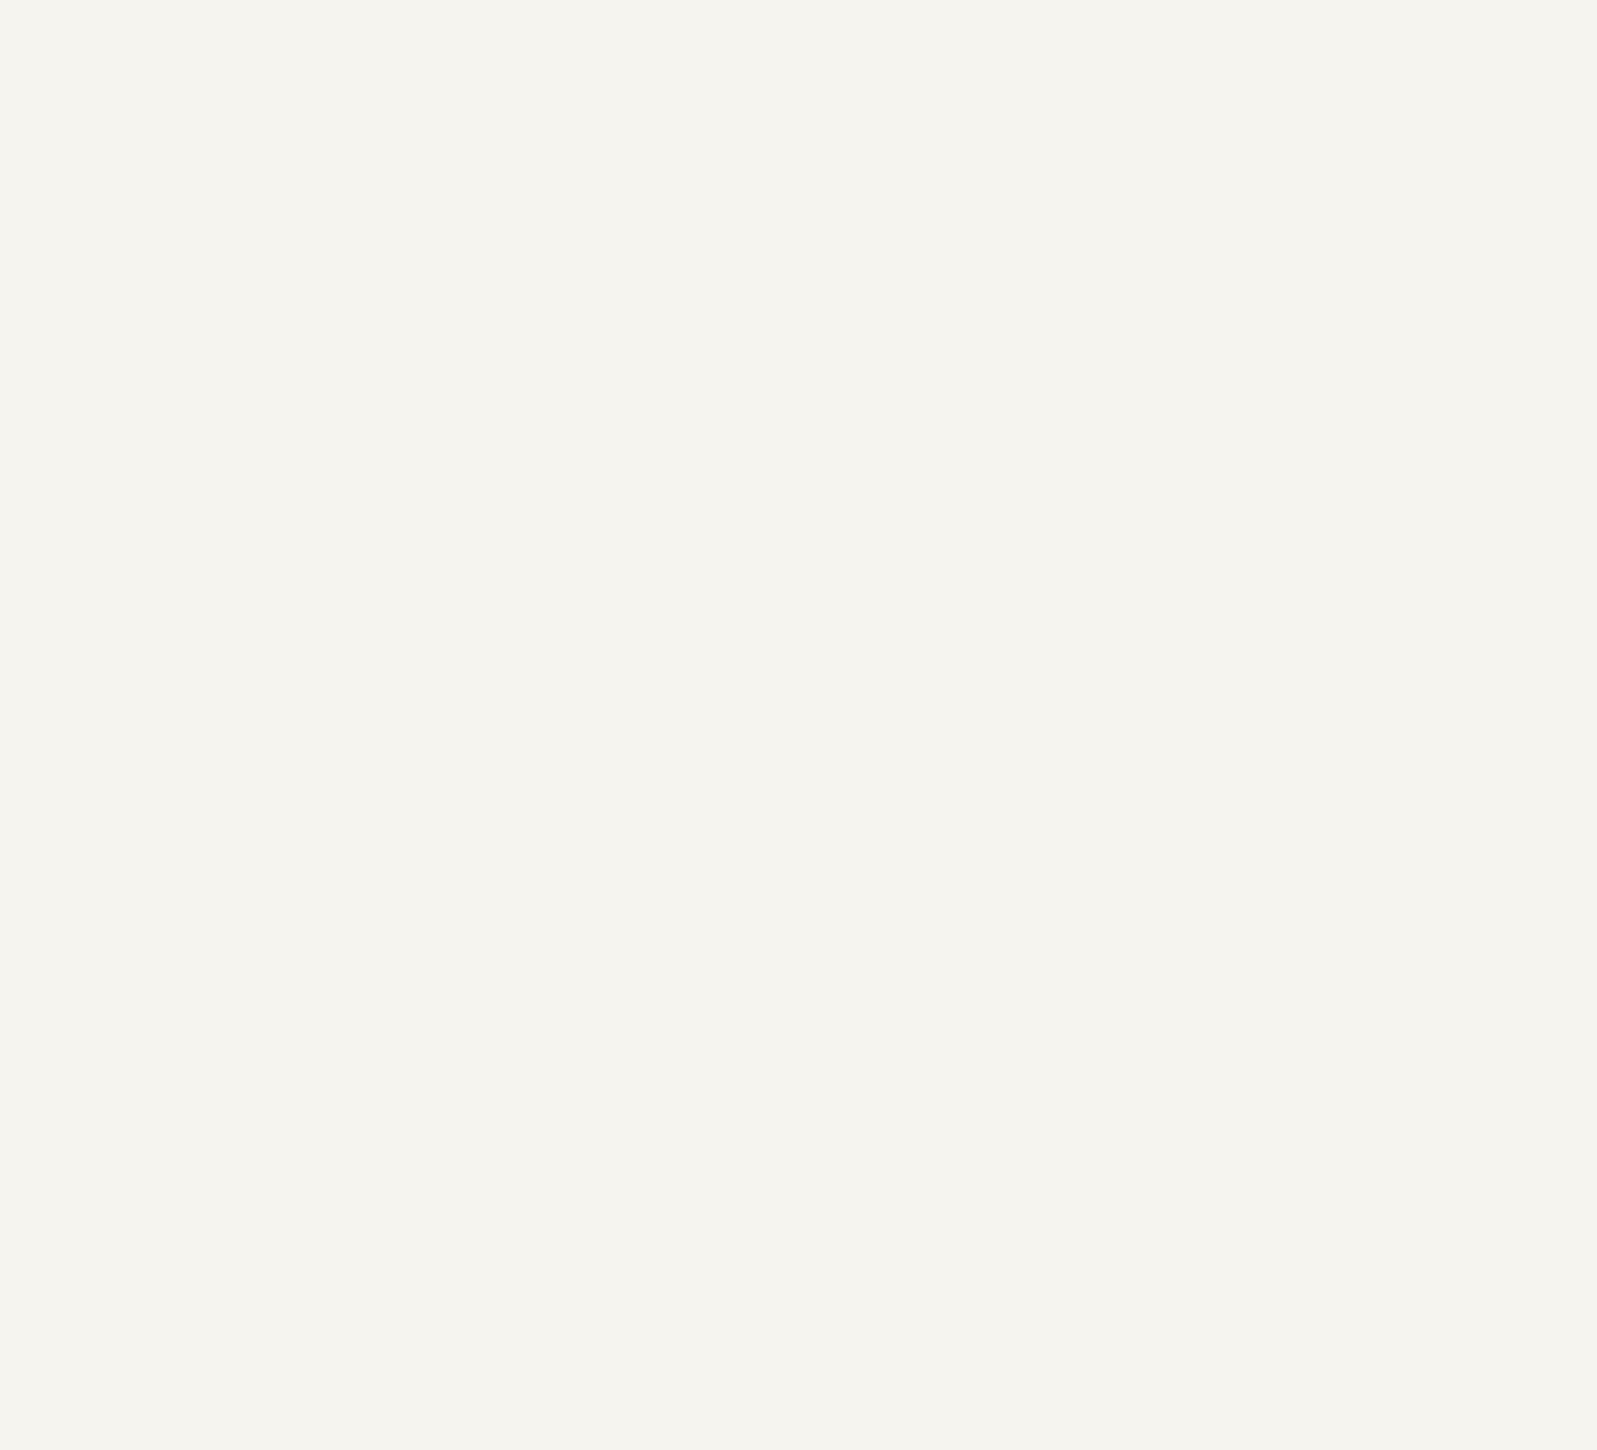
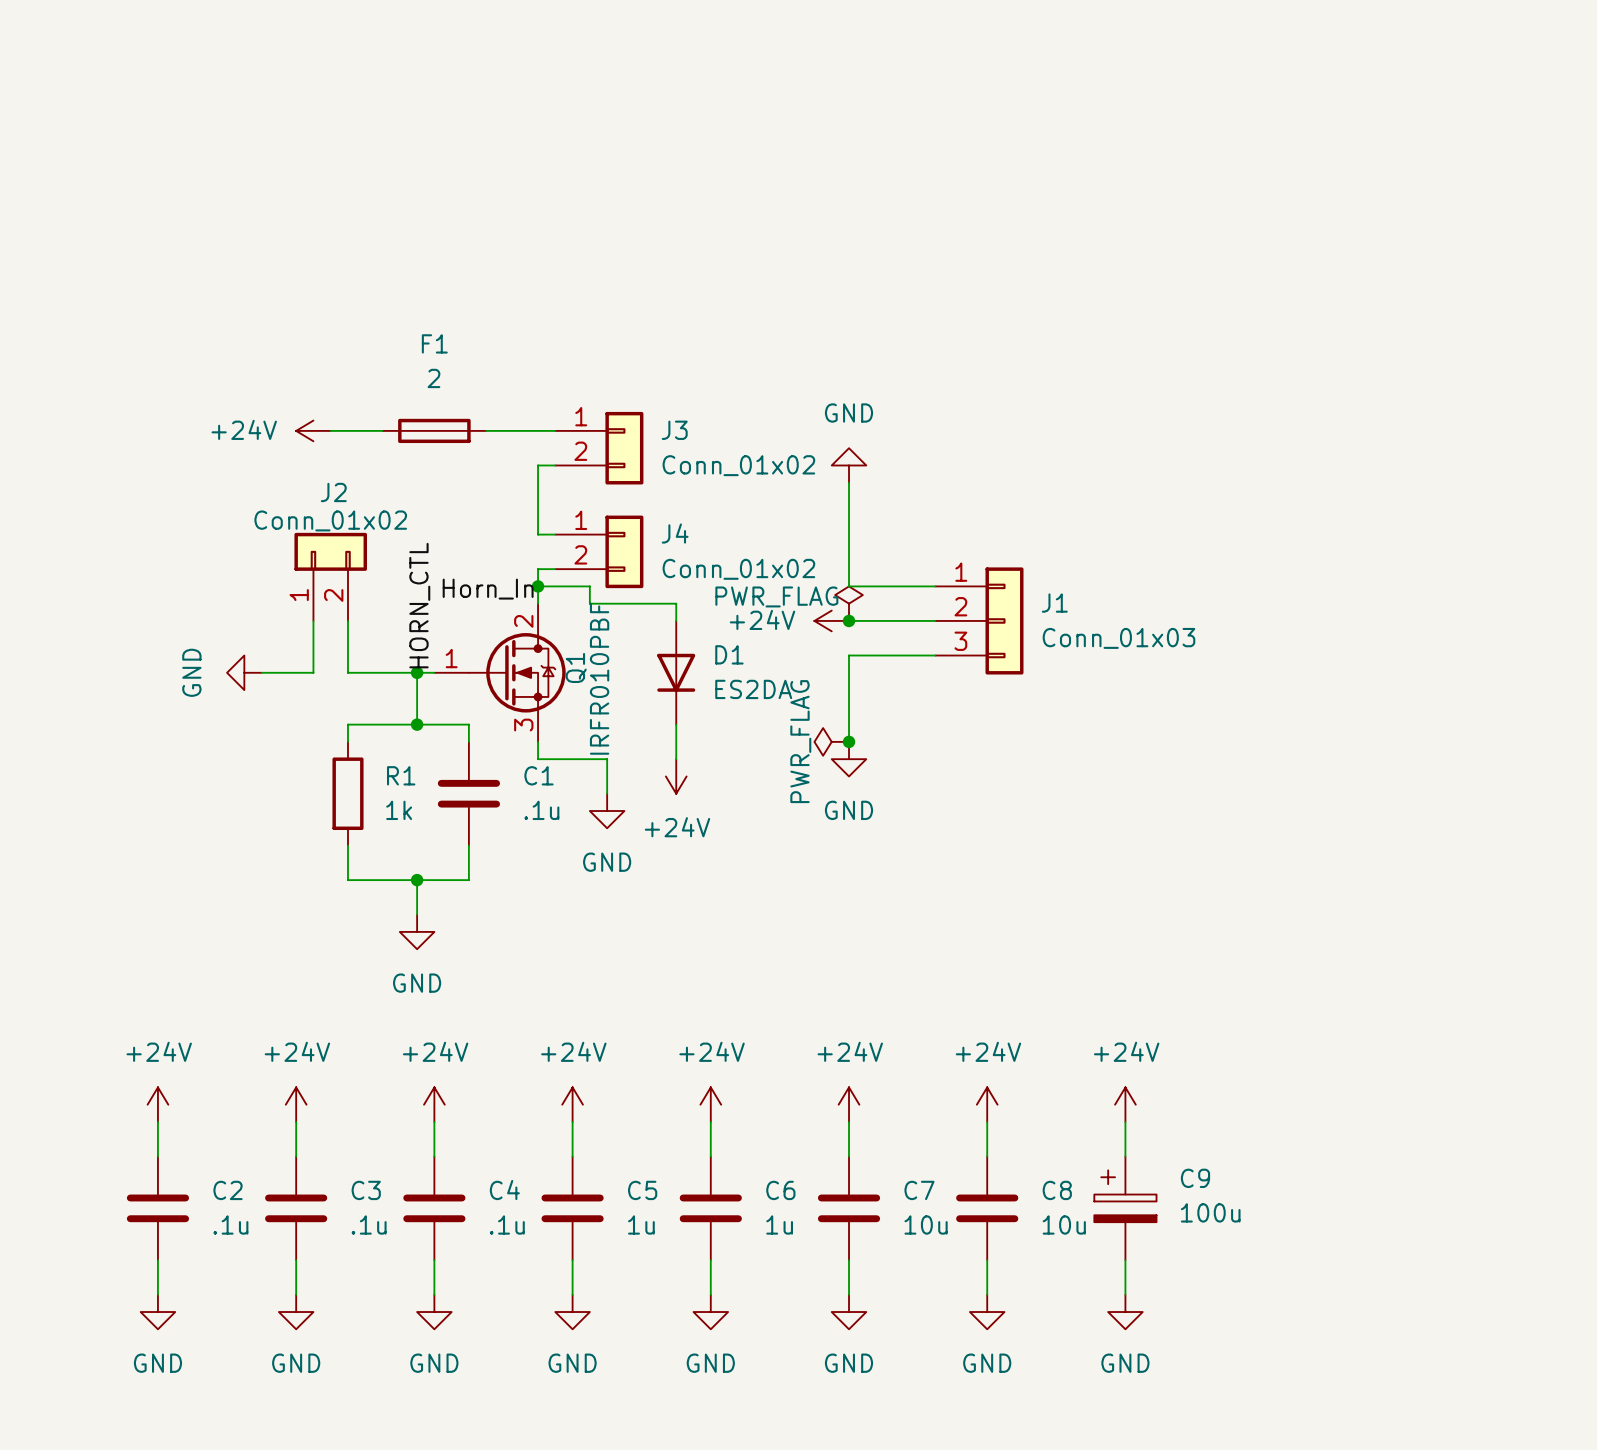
power symbol: none -> +24V (313, 430)
wire: none -> (330, 430) (382, 430)
F1: none -> 2 (434, 430)
wire: none -> (486, 430) (555, 430)
J3: none -> Conn_01x02 (599, 448)
wire: none -> (555, 465) (538, 465) (538, 534) (555, 534)
power symbol: none -> GND (849, 465)
wire: none -> (849, 482) (849, 586) (935, 586)
J4: none -> Conn_01x02 (599, 551)
wire: none -> (555, 569) (538, 569) (538, 603)
J2: none -> Conn_01x02 (330, 576)
wire: none -> (538, 586) (589, 586) (589, 603) (676, 603) (676, 620)
junction: none -> (538, 586)
label: none -> Horn_In (488, 589)
power symbol: none -> PWR_FLAG (849, 603)
label: none -> HORN_CTL (419, 605)
wire: none -> (313, 620) (313, 672) (261, 672)
wire: none -> (348, 620) (348, 672) (434, 672)
power symbol: none -> +24V (831, 620)
wire: none -> (849, 620) (935, 620)
junction: none -> (849, 620)
J1: none -> Conn_01x03 (979, 620)
wire: none -> (935, 655) (849, 655) (849, 741)
power symbol: none -> GND (244, 672)
wire: none -> (417, 672) (417, 724)
junction: none -> (417, 672)
Q1: none -> IRFR010PBF (500, 672)
D1: none -> ES2DA (676, 672)
junction: none -> (417, 724)
wire: none -> (676, 724) (676, 759)
wire: none -> (348, 741) (348, 724) (468, 724) (468, 741)
wire: none -> (538, 741) (538, 759) (607, 759) (607, 793)
power symbol: none -> PWR_FLAG (831, 741)
junction: none -> (849, 741)
power symbol: none -> GND (849, 759)
power symbol: none -> +24V (676, 776)
R1: none -> 1k (348, 793)
C1: none -> .1u (468, 793)
power symbol: none -> GND (607, 811)
wire: none -> (348, 845) (348, 880) (468, 880) (468, 845)
wire: none -> (417, 880) (417, 914)
junction: none -> (417, 880)
power symbol: none -> GND (417, 931)
power symbol: none -> +24V (157, 1104)
power symbol: none -> +24V (296, 1104)
power symbol: none -> +24V (434, 1104)
power symbol: none -> +24V (572, 1104)
power symbol: none -> +24V (710, 1104)
power symbol: none -> +24V (849, 1104)
power symbol: none -> +24V (987, 1104)
power symbol: none -> +24V (1125, 1104)
wire: none -> (157, 1121) (157, 1156)
wire: none -> (296, 1121) (296, 1156)
wire: none -> (434, 1121) (434, 1156)
wire: none -> (572, 1121) (572, 1156)
wire: none -> (710, 1121) (710, 1156)
wire: none -> (849, 1121) (849, 1156)
wire: none -> (987, 1121) (987, 1156)
wire: none -> (1125, 1121) (1125, 1156)
C2: none -> .1u (157, 1208)
C3: none -> .1u (296, 1208)
C4: none -> .1u (434, 1208)
C5: none -> 1u (572, 1208)
C6: none -> 1u (710, 1208)
C7: none -> 10u (849, 1208)
C8: none -> 10u (987, 1208)
C9: none -> 100u (1125, 1208)
wire: none -> (157, 1260) (157, 1294)
wire: none -> (296, 1260) (296, 1294)
wire: none -> (434, 1260) (434, 1294)
wire: none -> (572, 1260) (572, 1294)
wire: none -> (710, 1260) (710, 1294)
wire: none -> (849, 1260) (849, 1294)
wire: none -> (987, 1260) (987, 1294)
wire: none -> (1125, 1260) (1125, 1294)
power symbol: none -> GND (157, 1312)
power symbol: none -> GND (296, 1312)
power symbol: none -> GND (434, 1312)
power symbol: none -> GND (572, 1312)
power symbol: none -> GND (710, 1312)
power symbol: none -> GND (849, 1312)
power symbol: none -> GND (987, 1312)
power symbol: none -> GND (1125, 1312)

